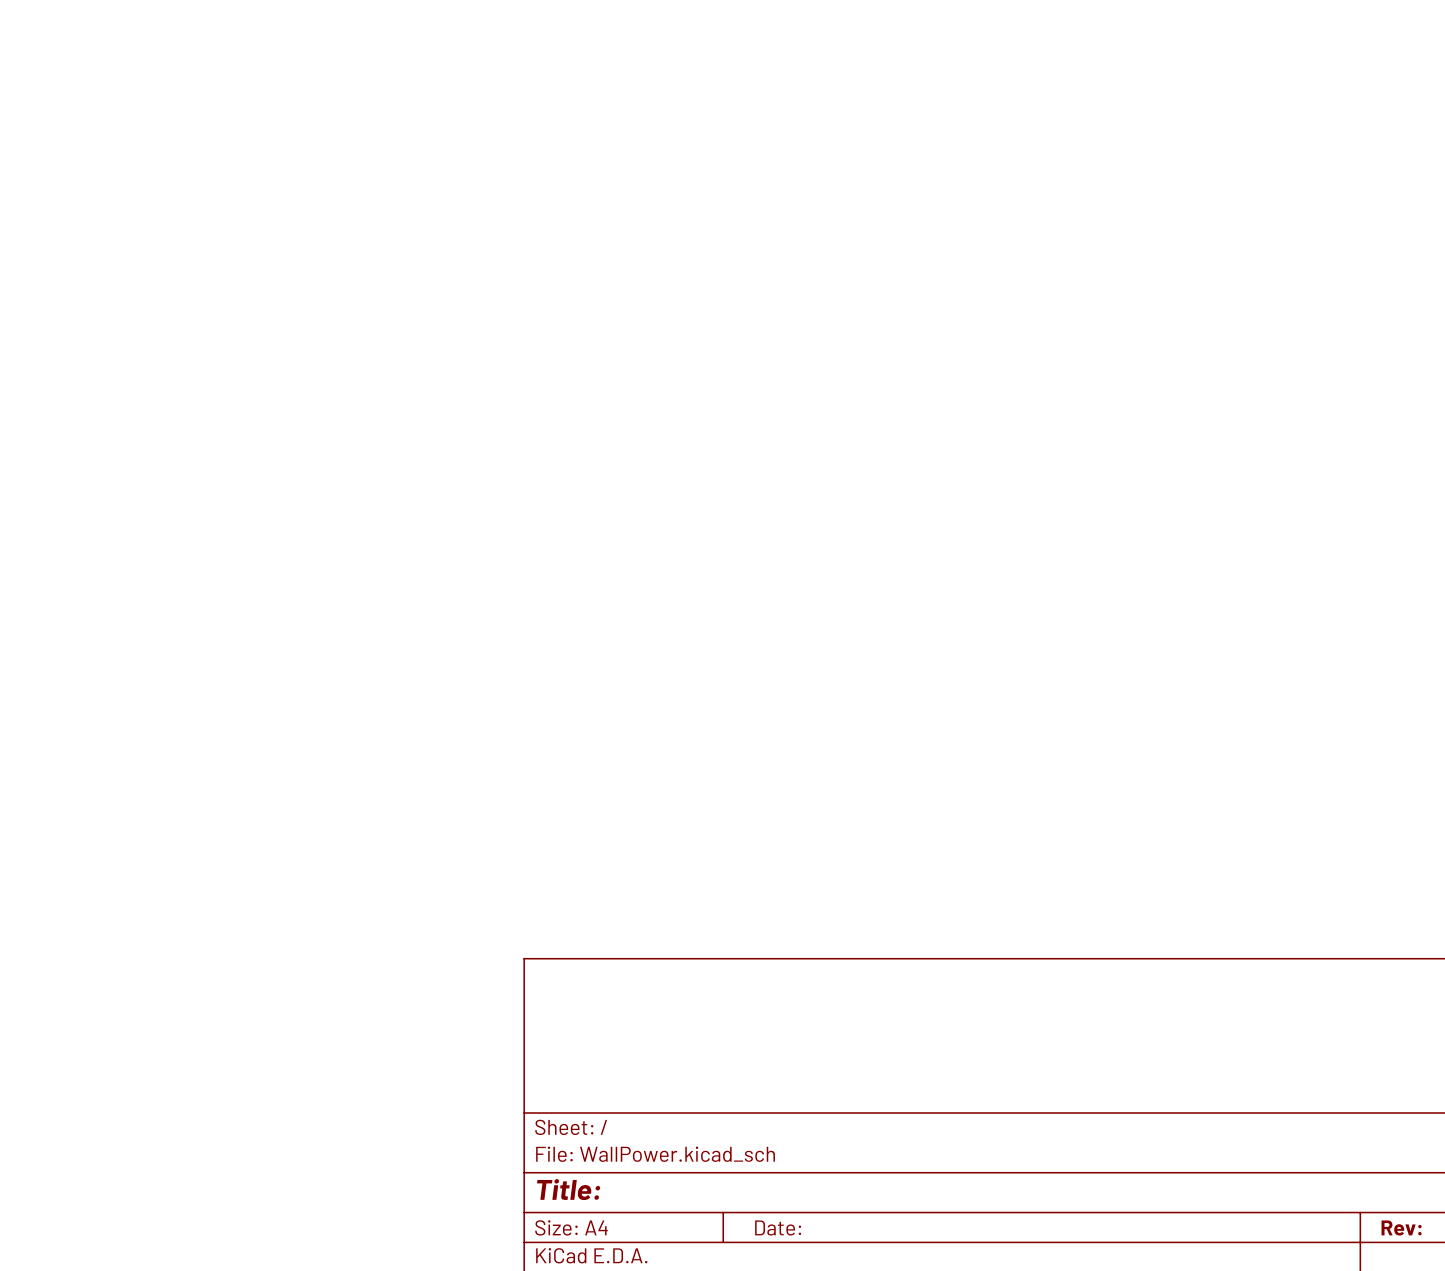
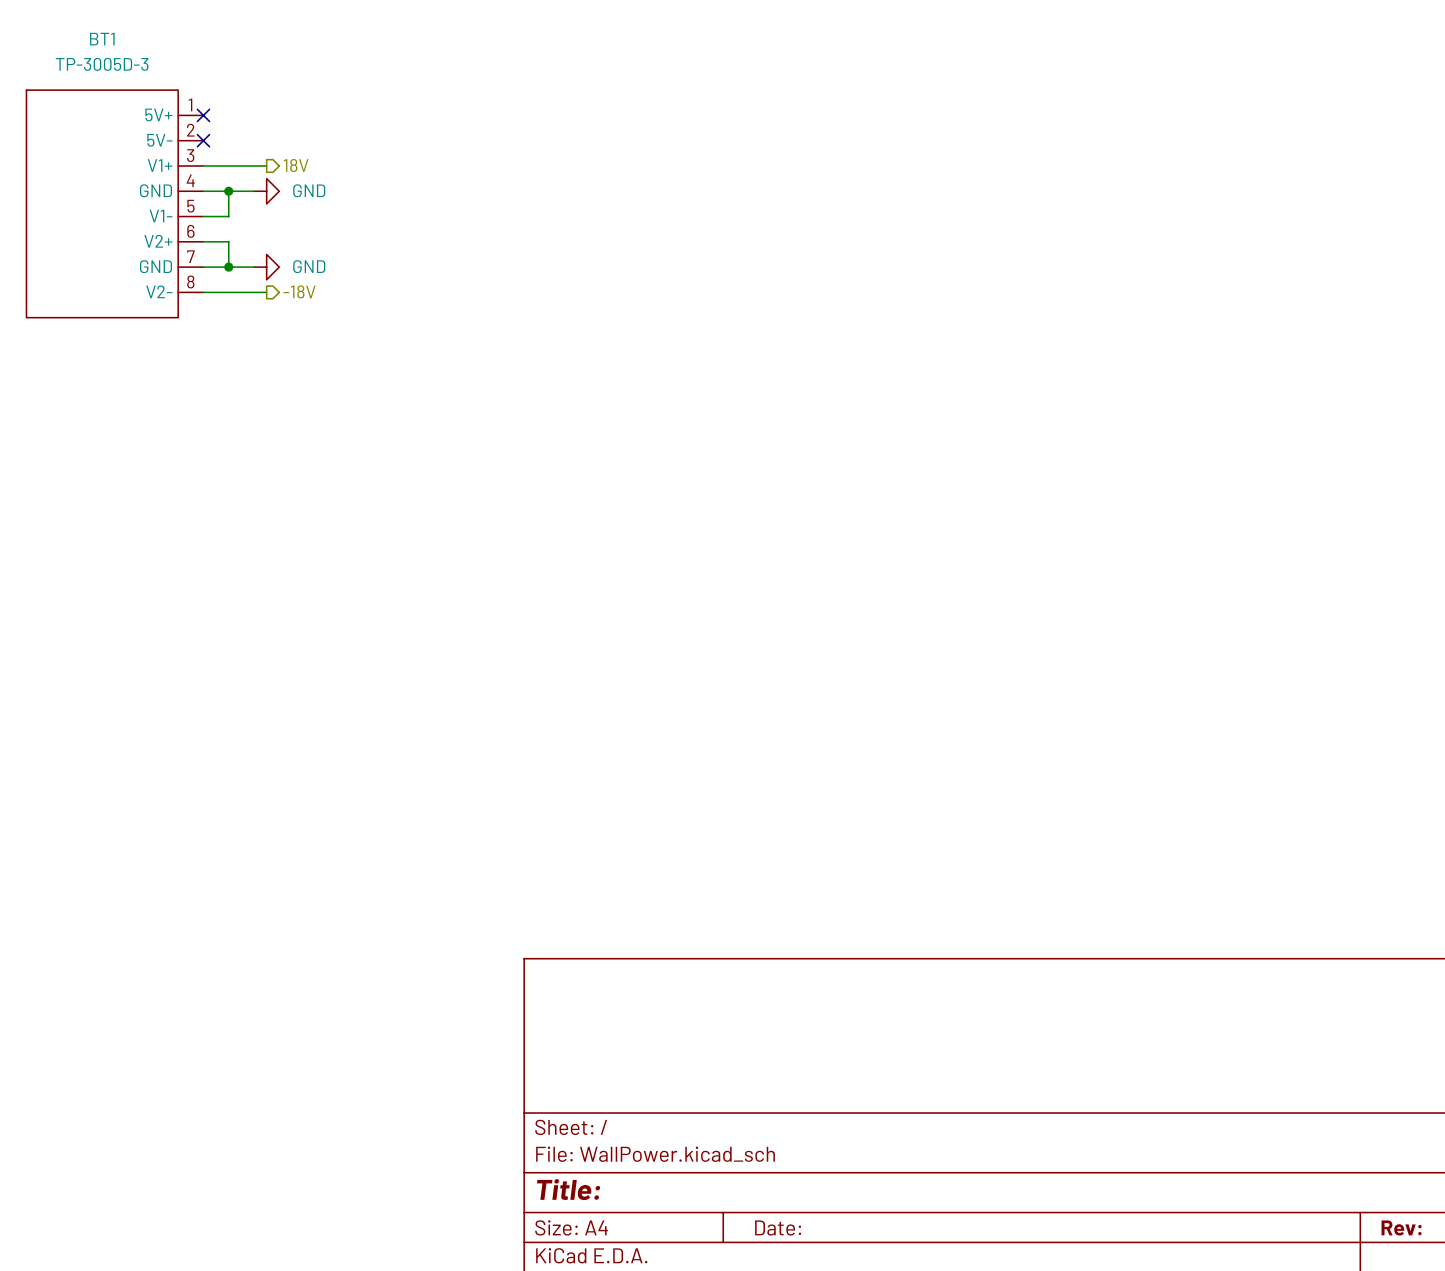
no-connect mark: none -> (203, 115)
no-connect mark: none -> (203, 140)
wire: none -> (203, 165) (266, 165)
hierarchical label: none -> 18V (296, 165)
wire: none -> (203, 191) (254, 191)
wire: none -> (228, 191) (228, 216) (203, 216)
junction: none -> (228, 191)
power symbol: none -> GND (266, 191)
BT1: none -> TP-3005D-3 (114, 203)
wire: none -> (203, 241) (228, 241) (228, 267)
wire: none -> (203, 267) (254, 267)
junction: none -> (228, 267)
power symbol: none -> GND (266, 267)
hierarchical label: none -> -18V (299, 291)
wire: none -> (203, 292) (266, 292)

